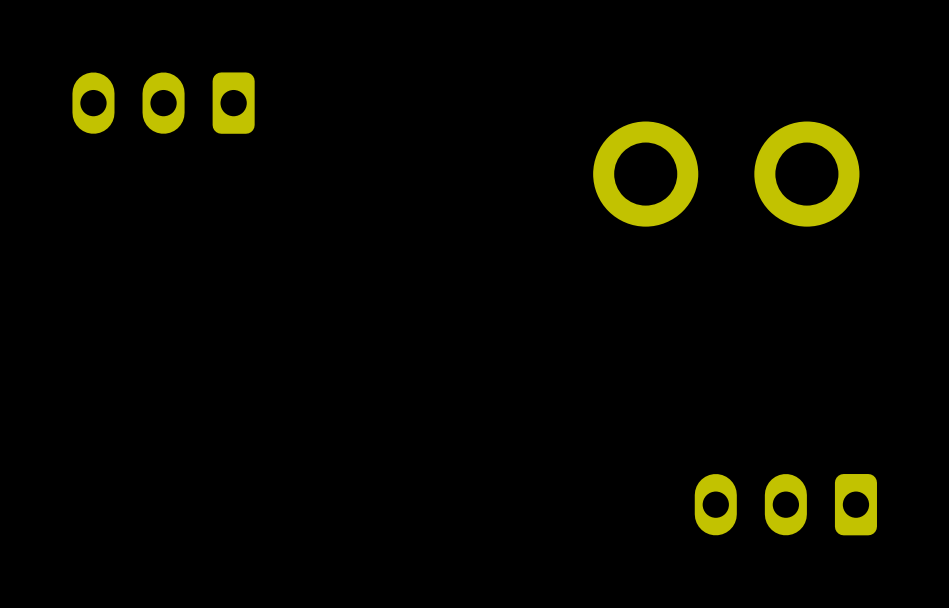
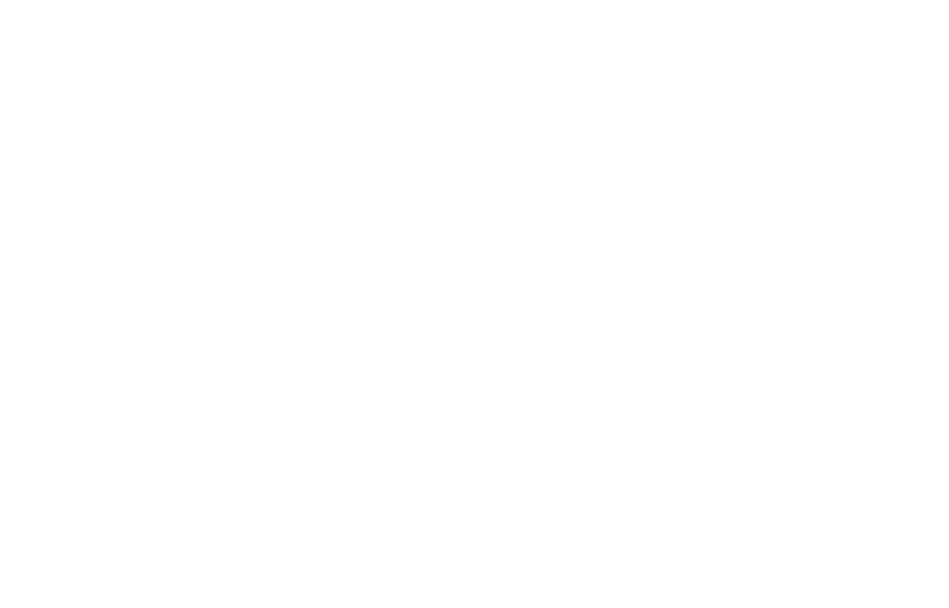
part: (163, 103) -> none
part: (726, 174) -> none
part: (785, 504) -> none

